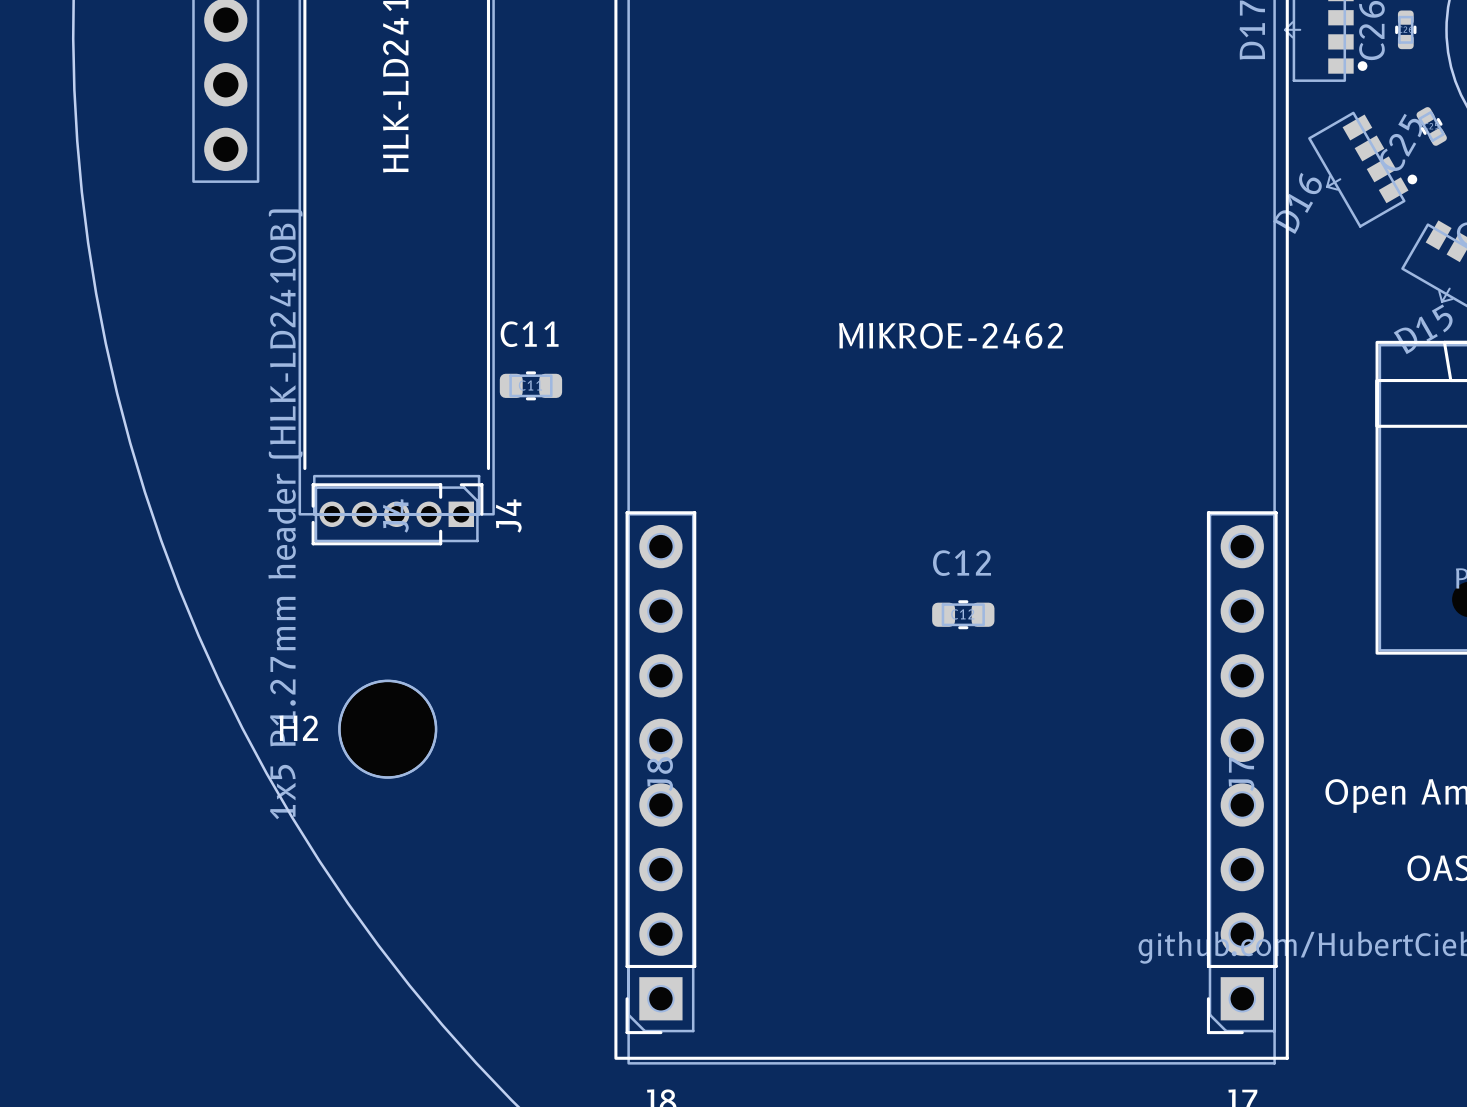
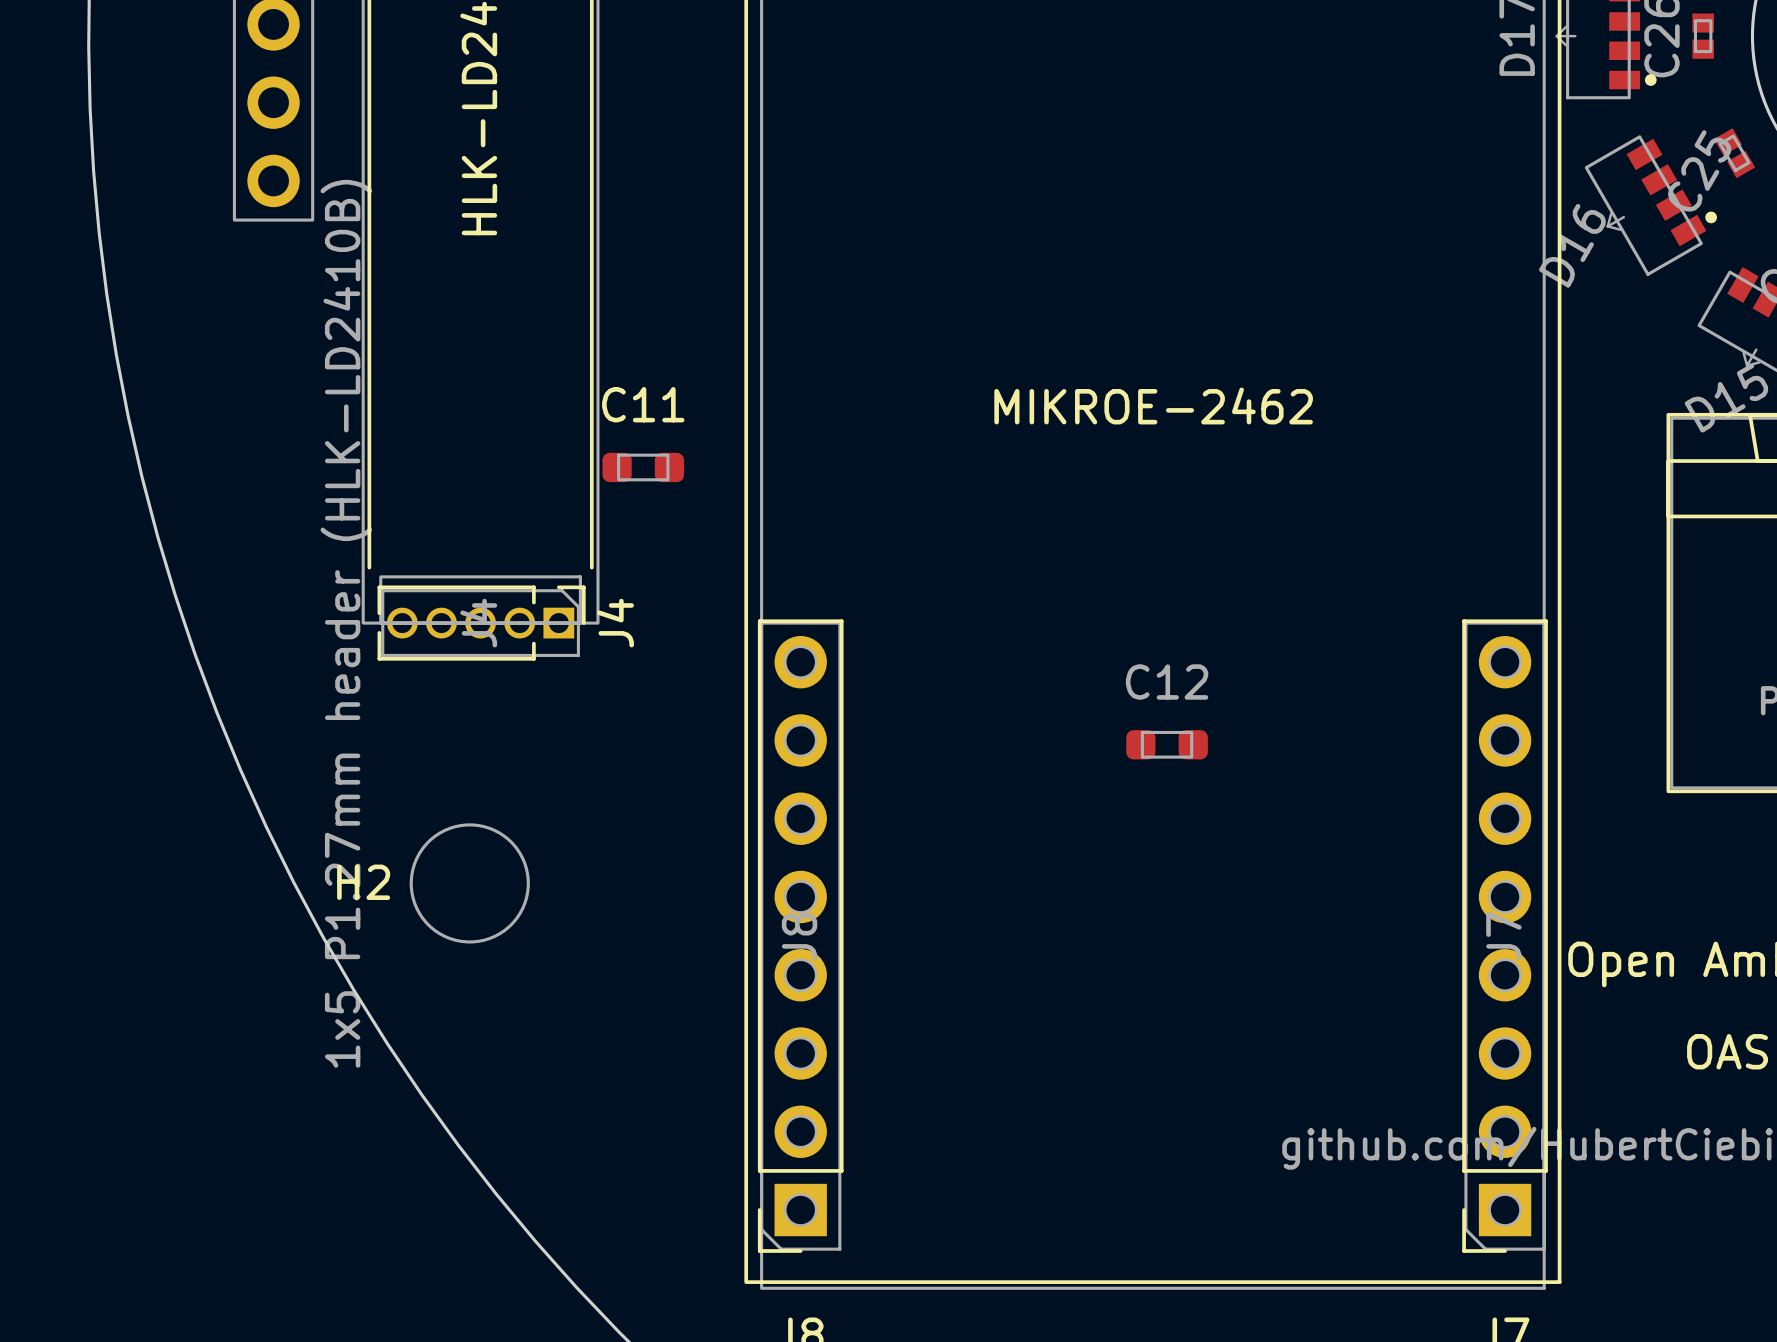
part footprint: [1395, 10, 1417, 50] -> [1692, 13, 1714, 59]
part footprint: [1416, 107, 1447, 146] -> [1713, 128, 1756, 179]
part footprint: [499, 371, 563, 401] -> [602, 452, 685, 483]
part footprint: [932, 600, 995, 630] -> [1126, 730, 1208, 760]

